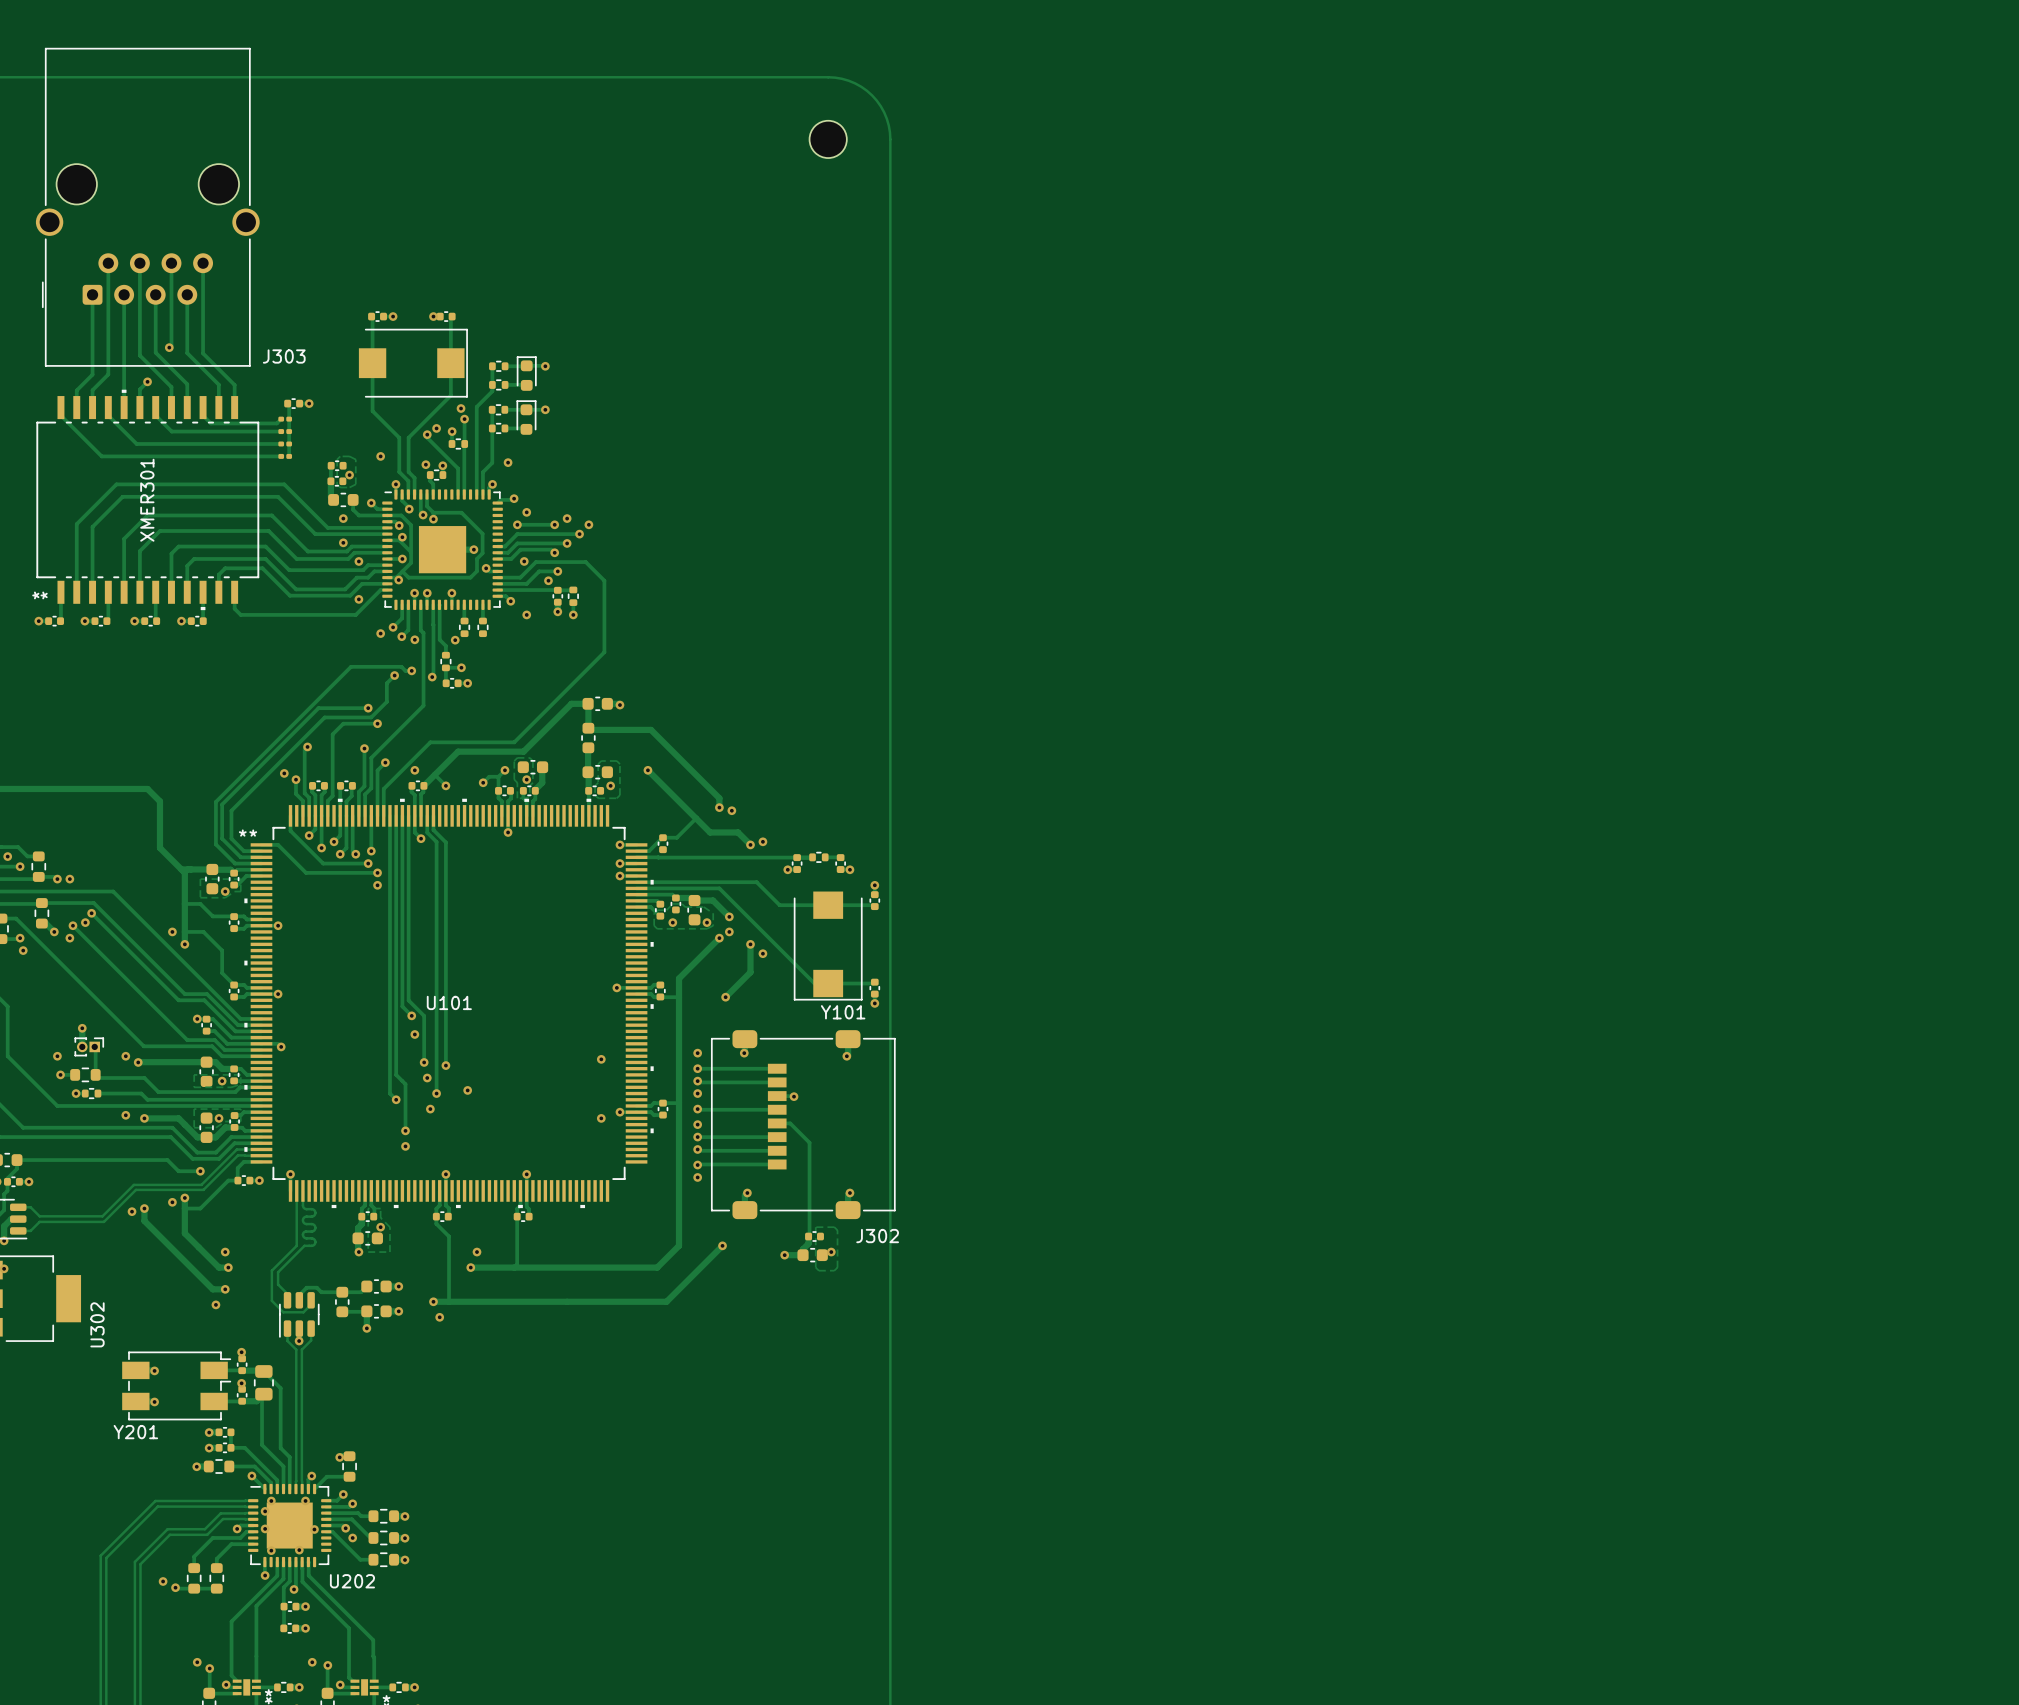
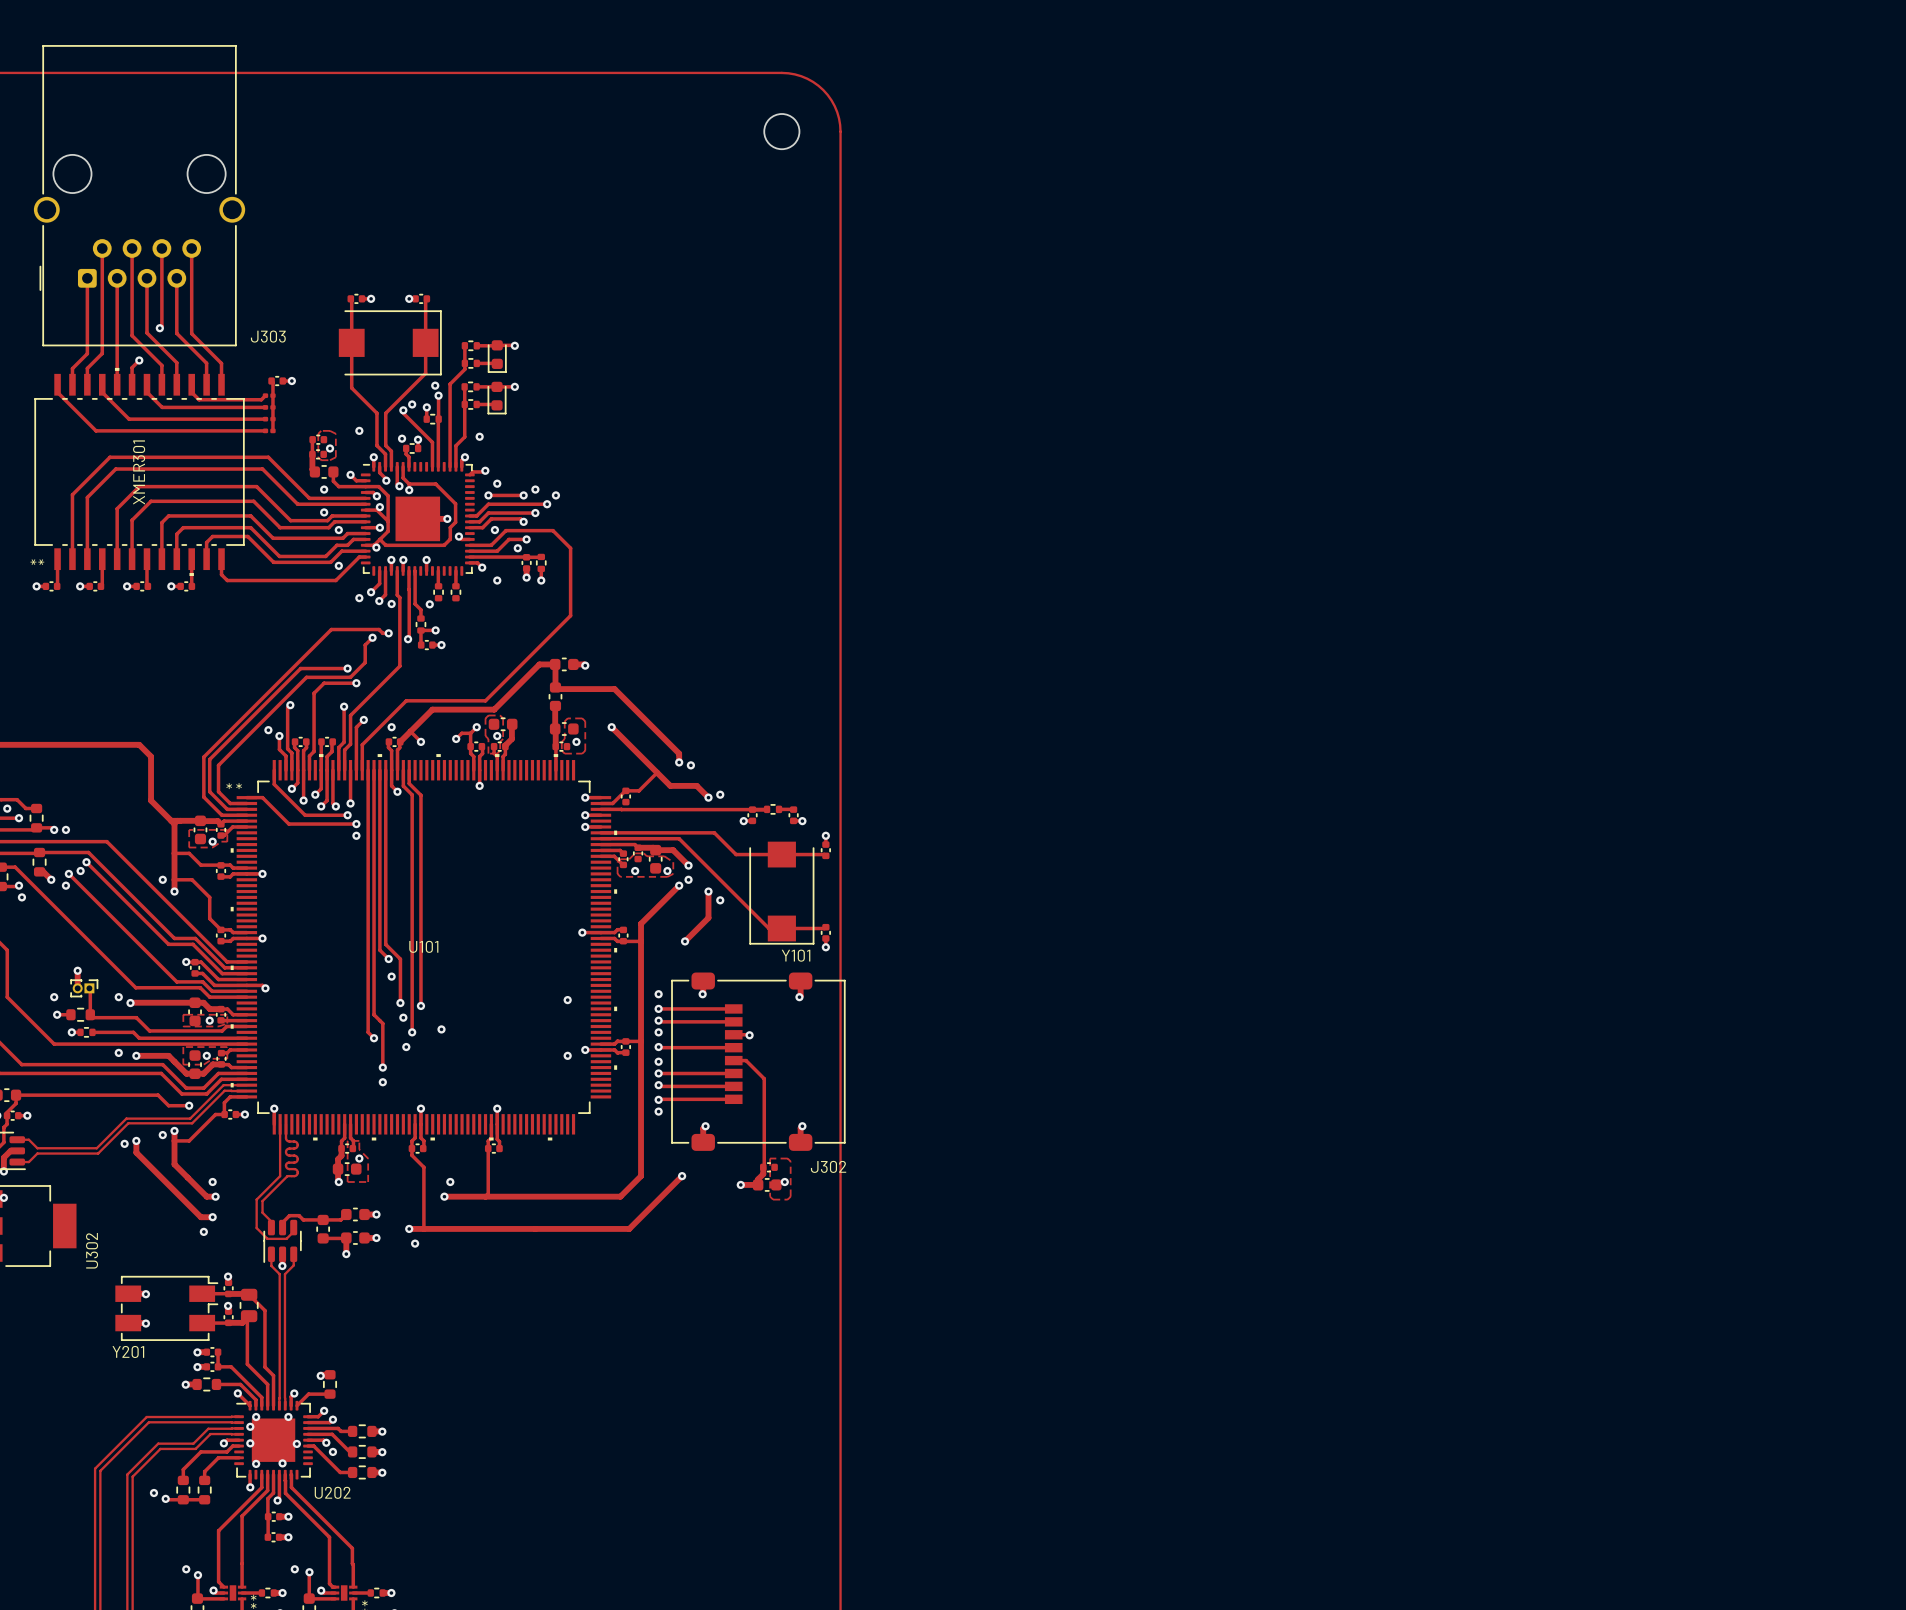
part rotation: 0° (526, 373) -> 180° (497, 356)
part rotation: 0° (526, 417) -> 180° (497, 397)

